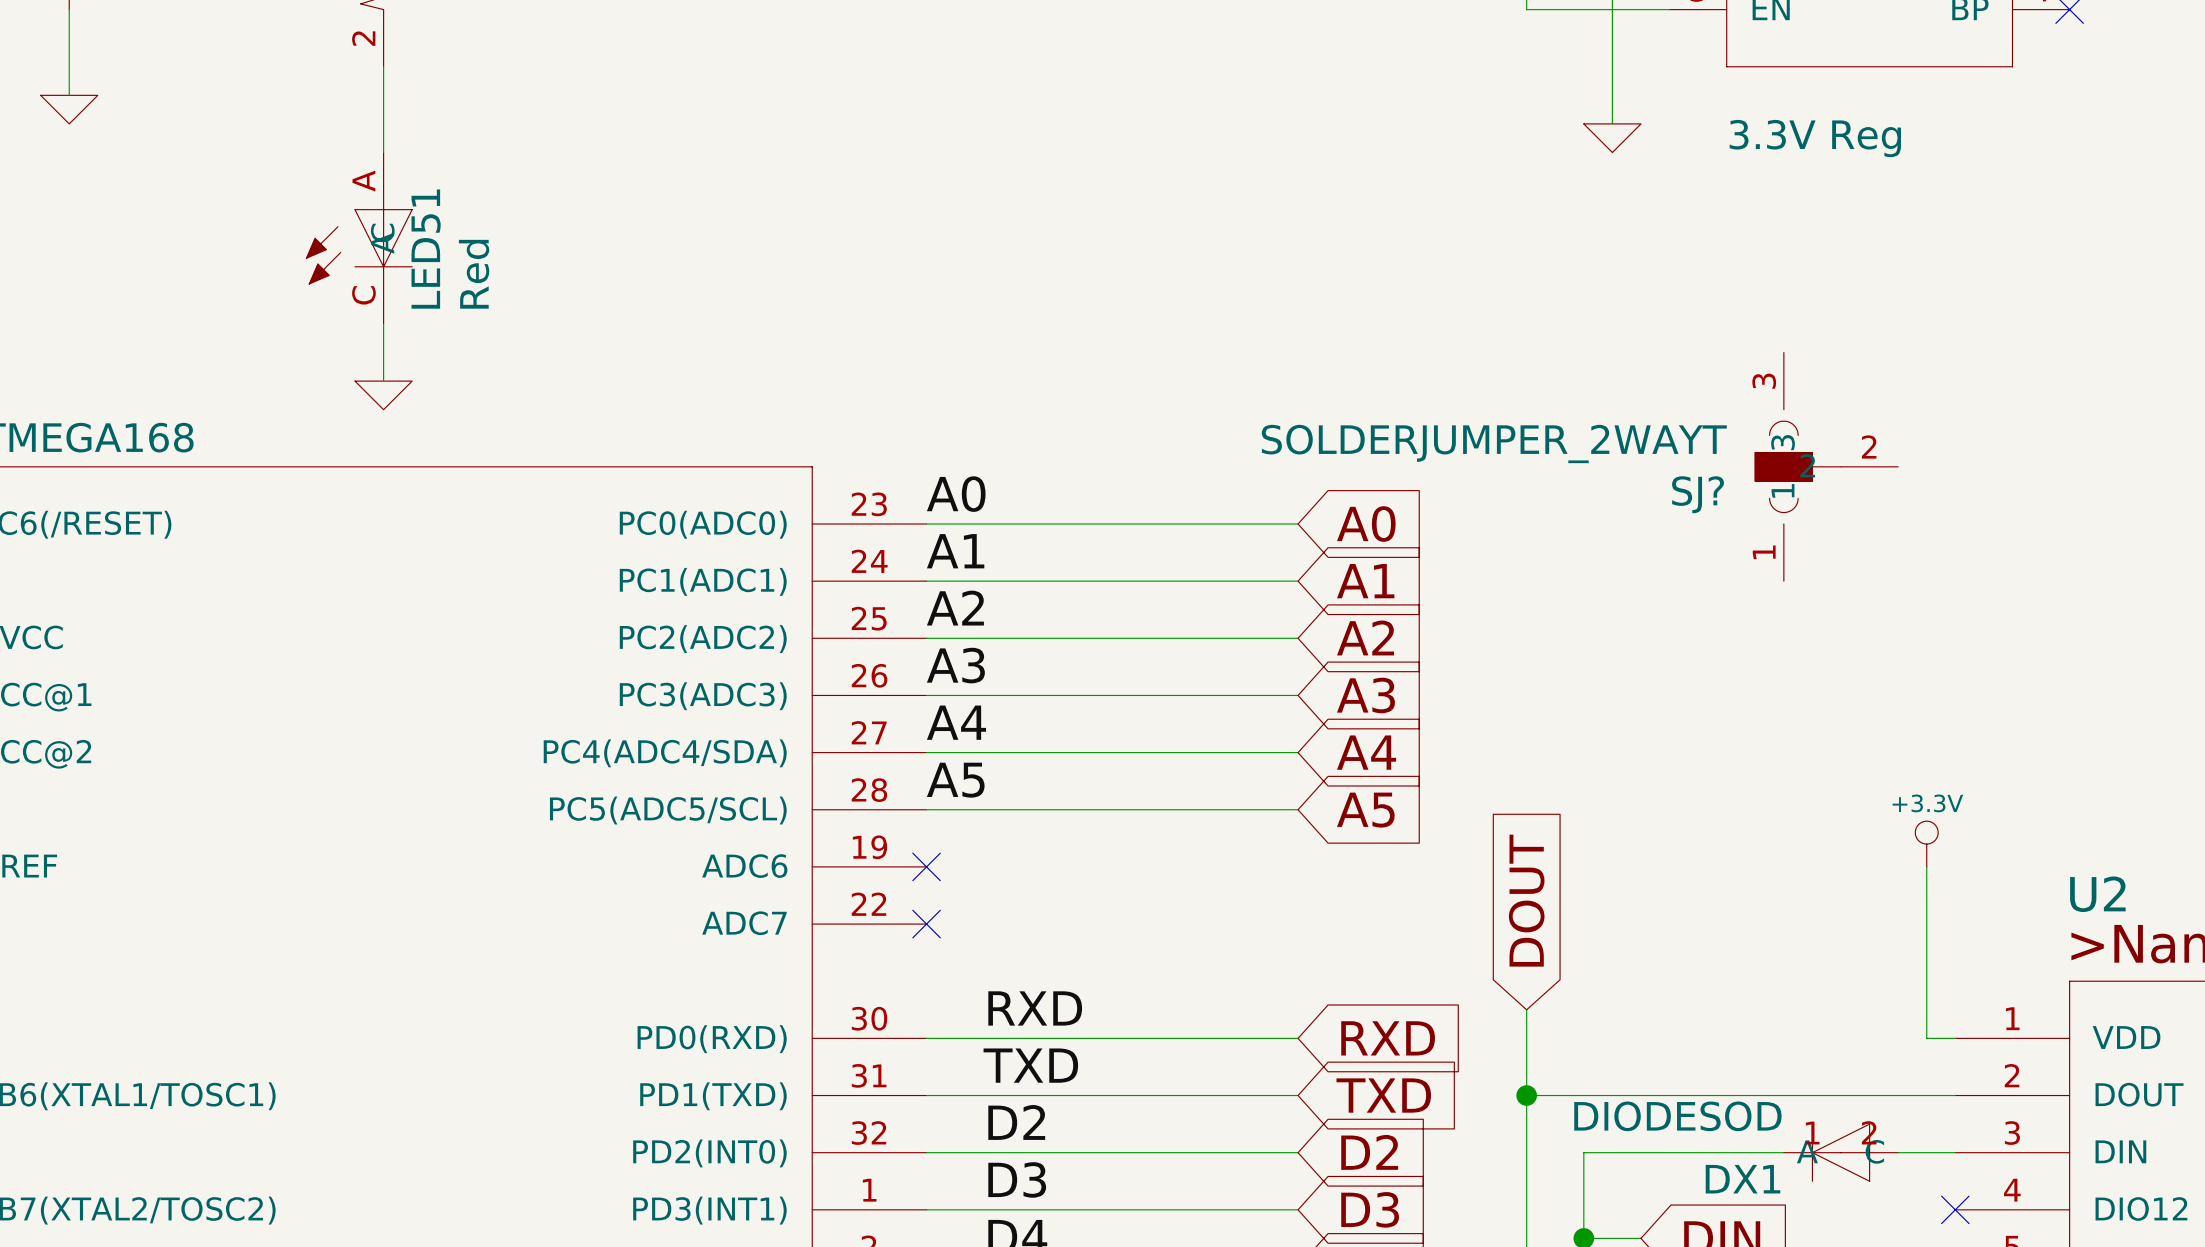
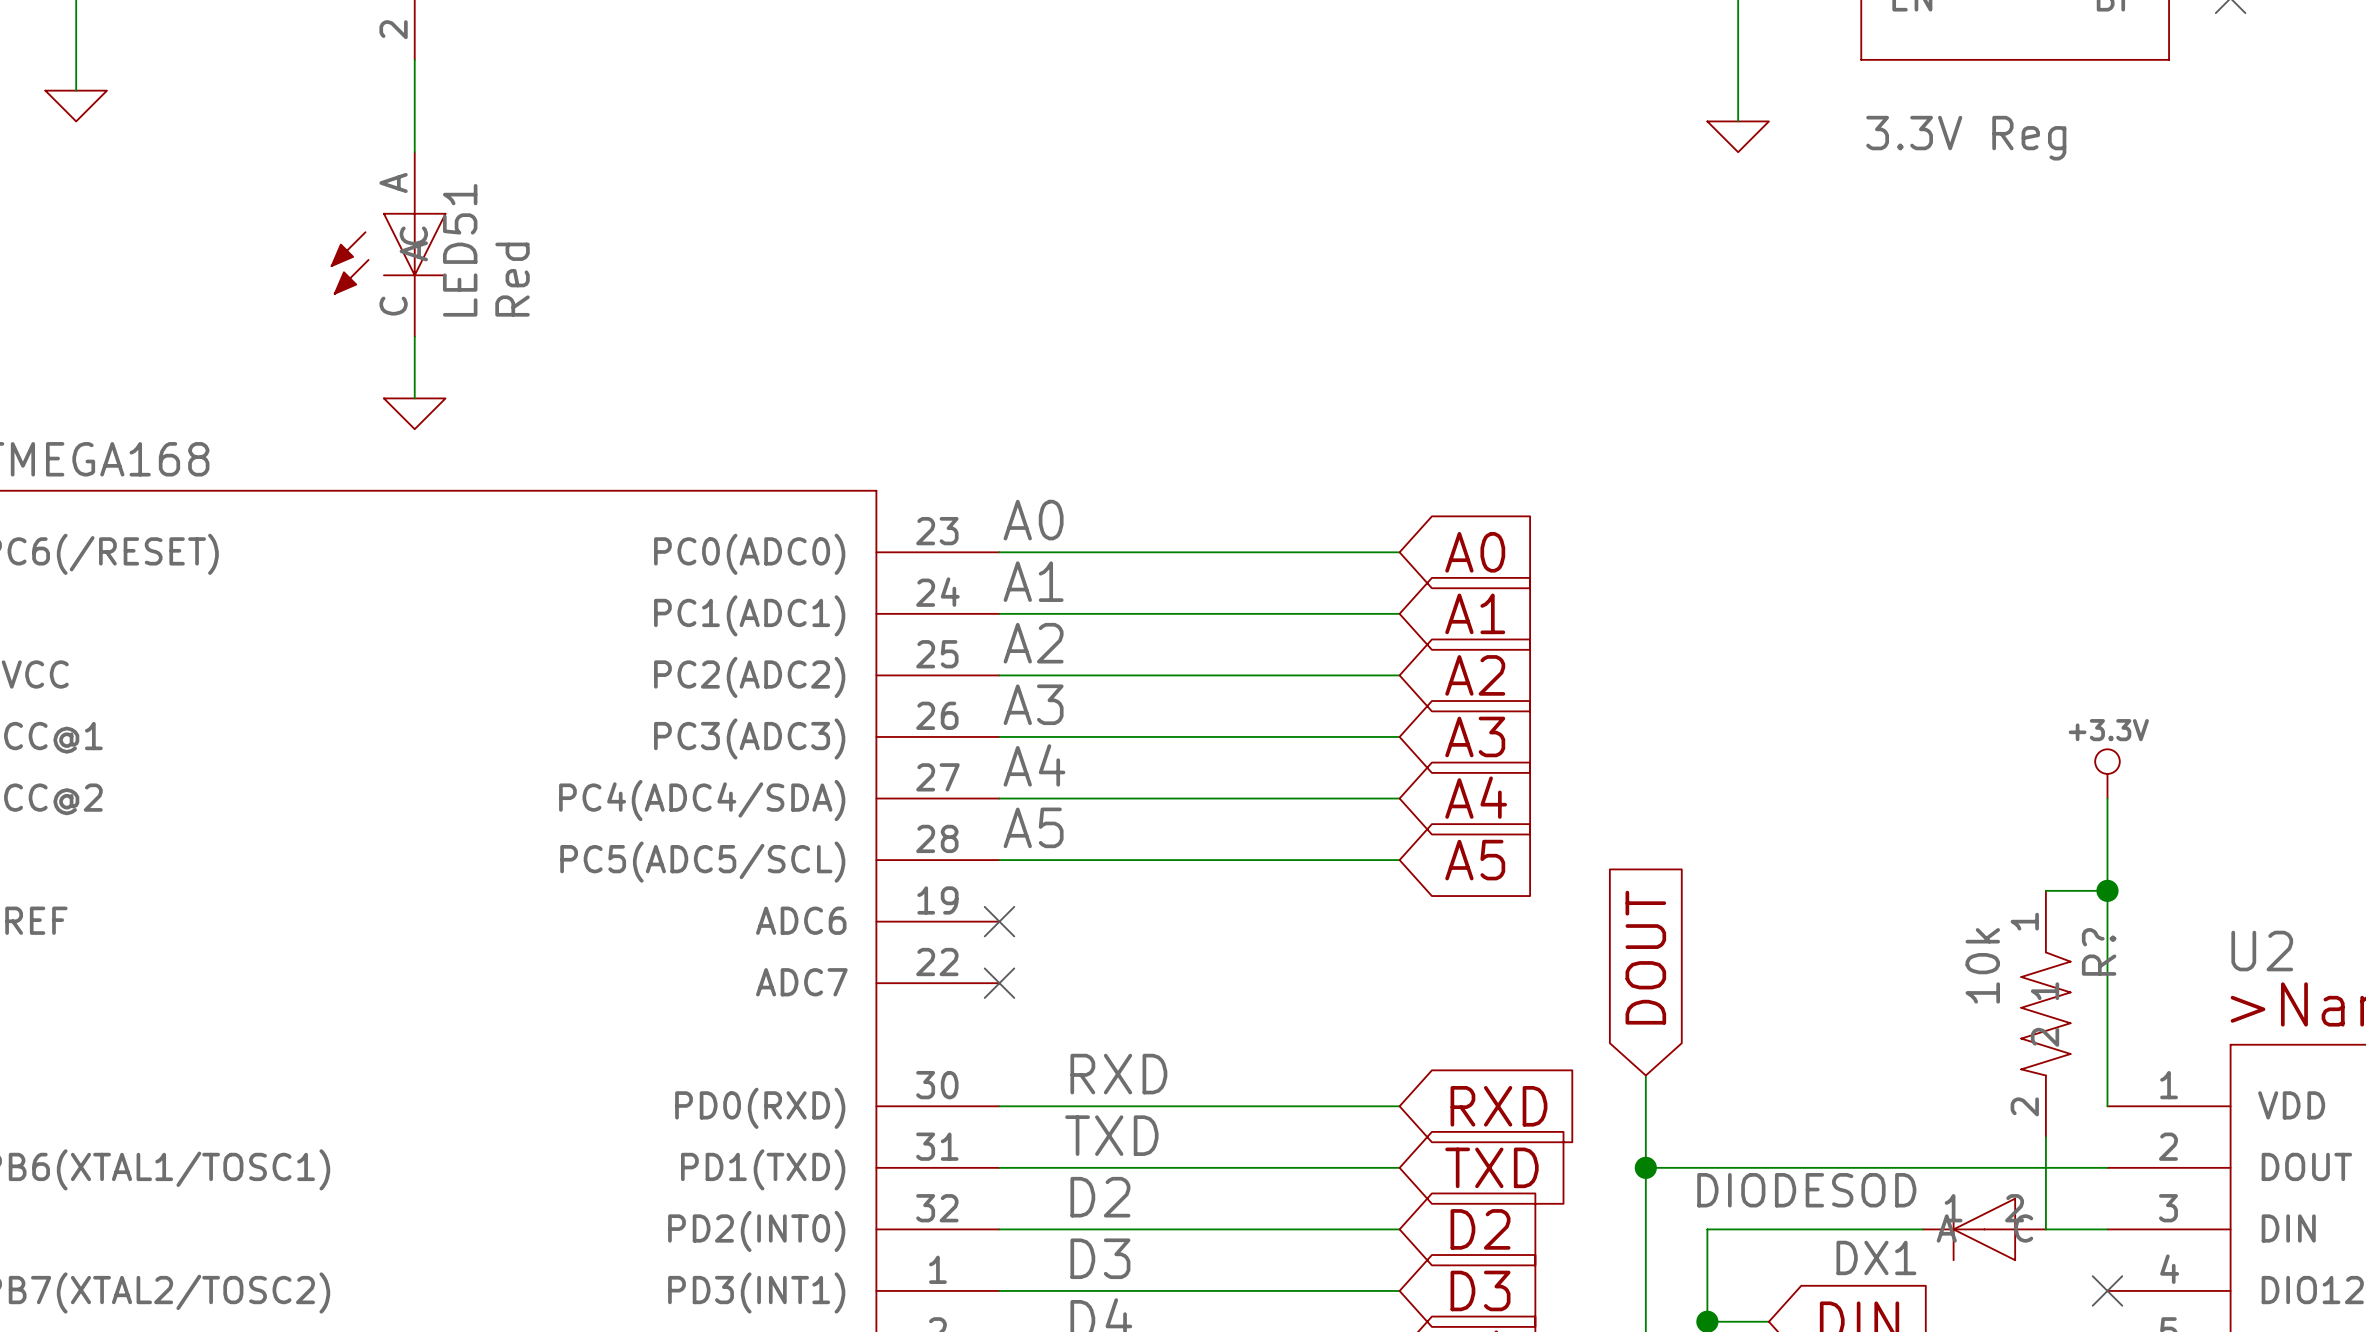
SJ?: SOLDERJUMPER_2WAYT (1826, 466) -> none
wire: none -> (2045, 890) (2107, 890)
junction: none -> (2107, 890)
power symbol position: +3.3V (1926, 844) -> +3.3V (2107, 773)
wire: (1926, 866) (1926, 1038) (1955, 1038) -> (2107, 798) (2107, 1106)
R?: none -> 10k (2045, 1013)
wire: none -> (2045, 1137) (2045, 1229)

